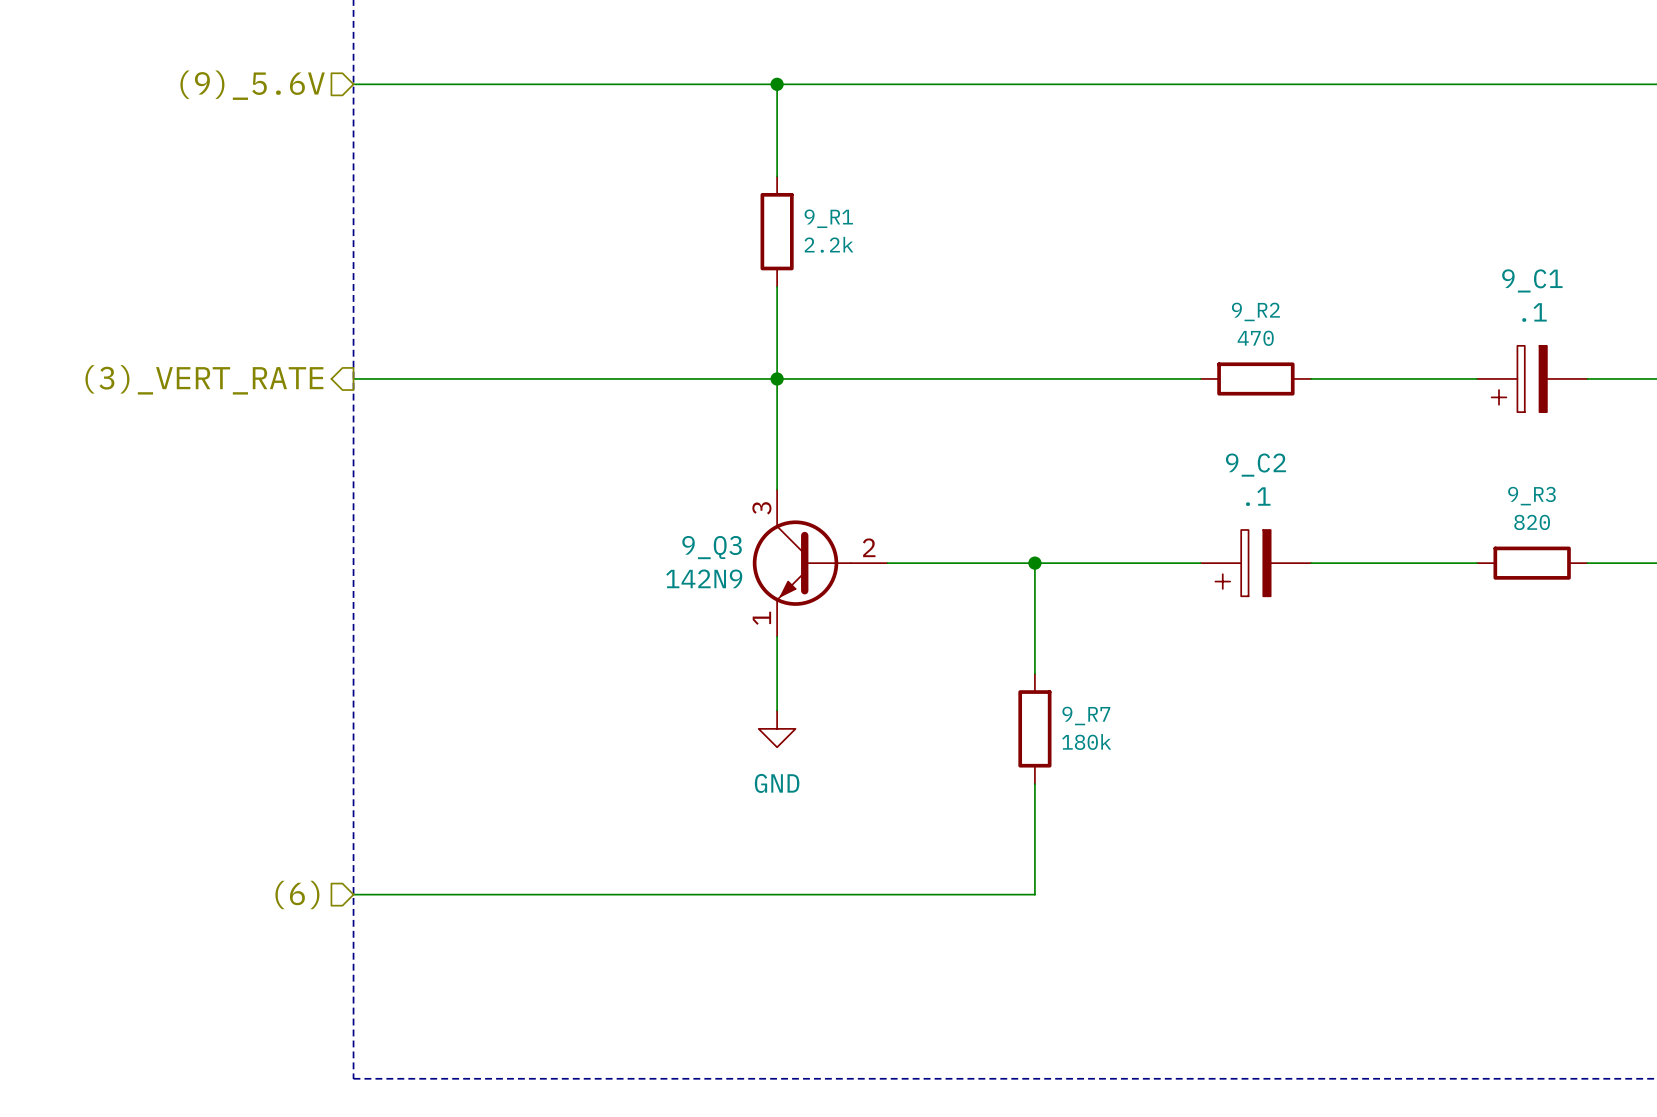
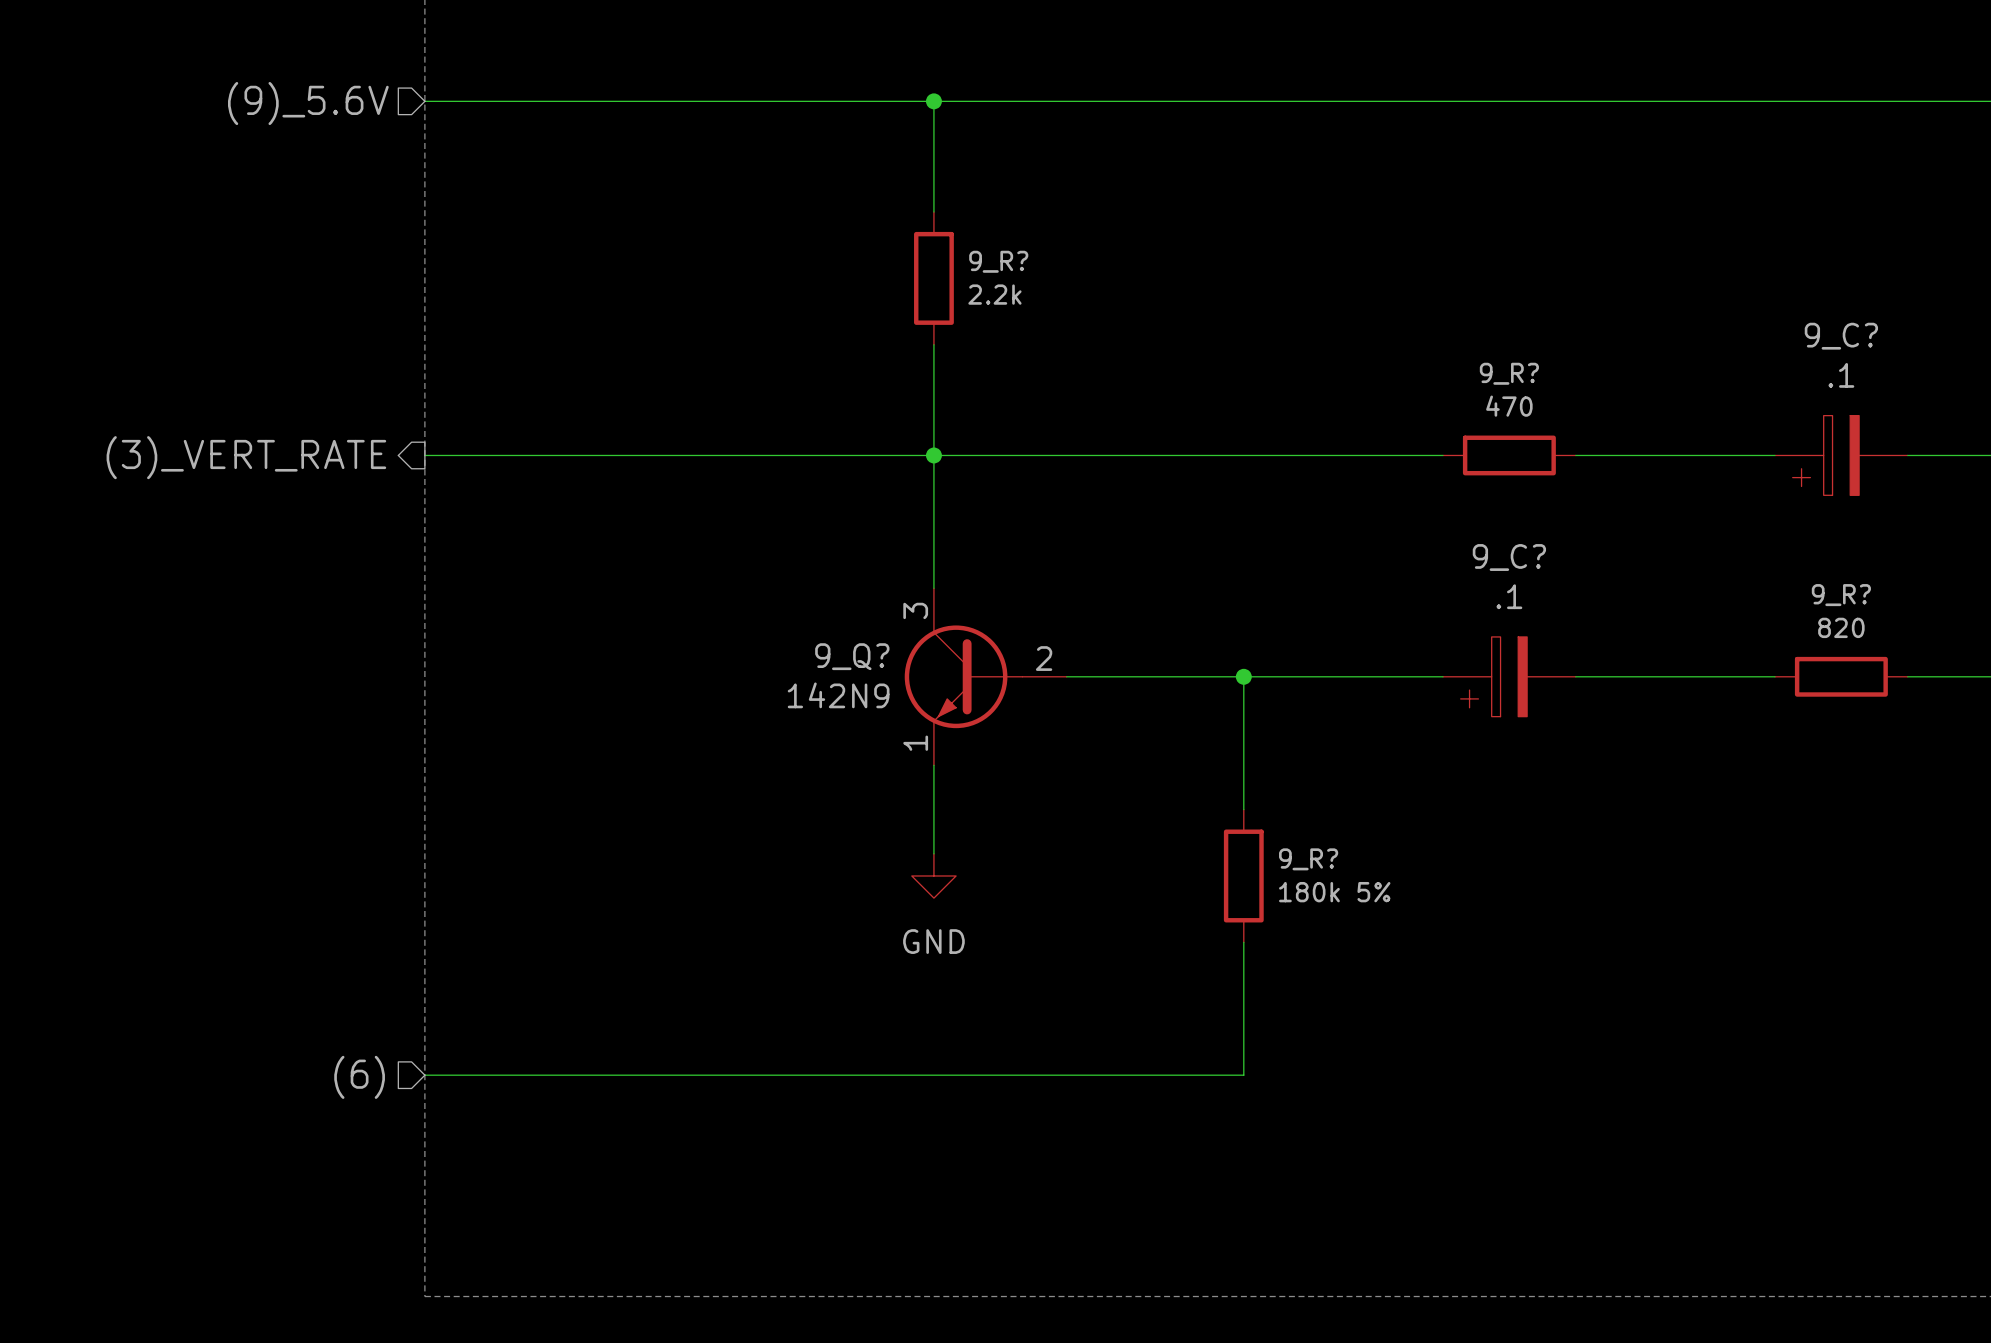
9_R1 name: 9_R1 (828, 218) -> 9_R? (998, 261)
9_C1 name: 9_C1 (1532, 280) -> 9_C? (1841, 336)
9_R2 name: 9_R2 (1255, 311) -> 9_R? (1509, 373)
9_C2 name: 9_C2 (1255, 465) -> 9_C? (1509, 557)
9_R3 name: 9_R3 (1531, 496) -> 9_R? (1841, 595)
9_Q3 name: 9_Q3 (712, 547) -> 9_Q? (852, 656)
9_R7 name: 9_R7 (1086, 715) -> 9_R? (1308, 859)
9_R7 value: 180k (1086, 742) -> 180k 5% (1334, 892)

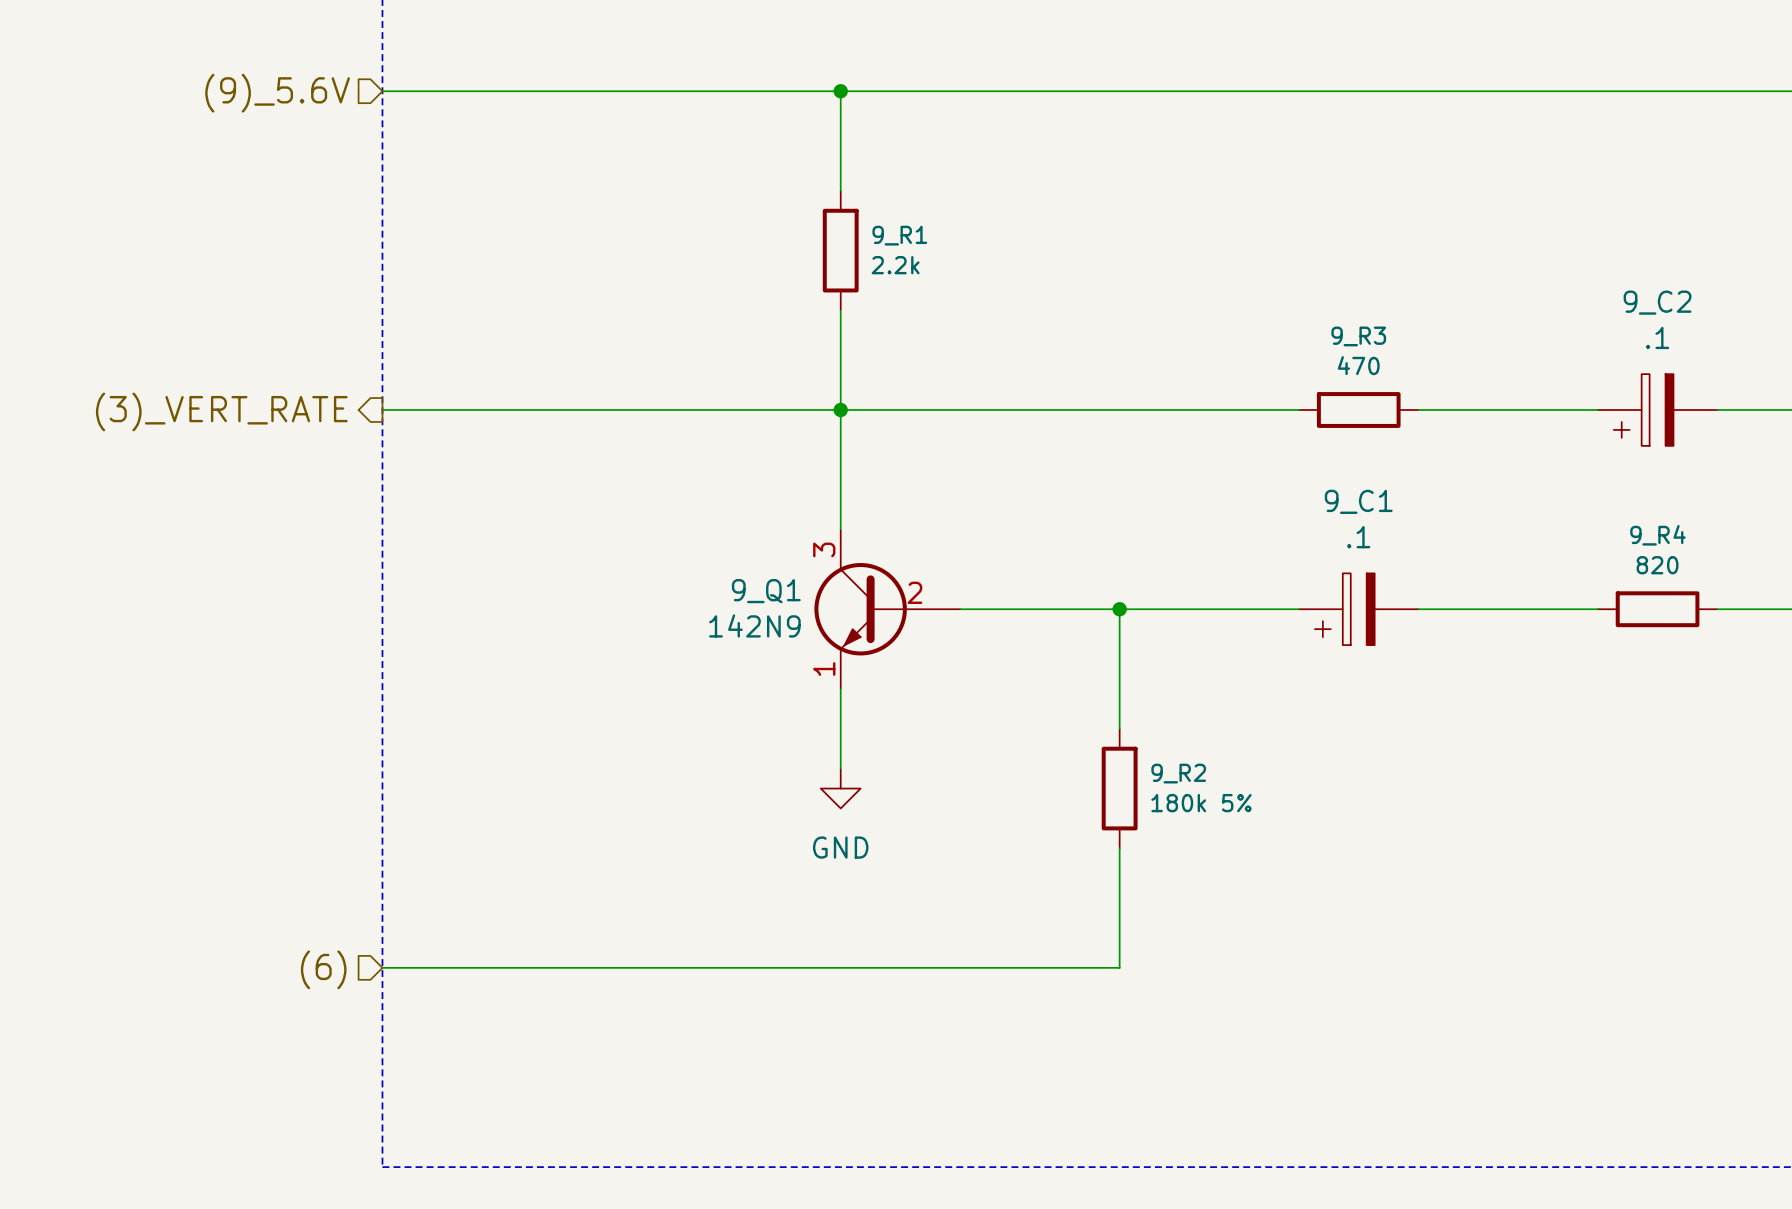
9_R? name: 9_R? (998, 261) -> 9_R1 (899, 235)
9_C? name: 9_C? (1841, 336) -> 9_C2 (1657, 302)
9_R? name: 9_R? (1509, 373) -> 9_R3 (1358, 336)
9_C? name: 9_C? (1509, 557) -> 9_C1 (1358, 501)
9_R? name: 9_R? (1841, 595) -> 9_R4 (1657, 535)
9_Q?: 142N9 (985, 676) -> none
9_Q1: none -> 142N9 (887, 609)
9_R? name: 9_R? (1308, 859) -> 9_R2 (1178, 773)

